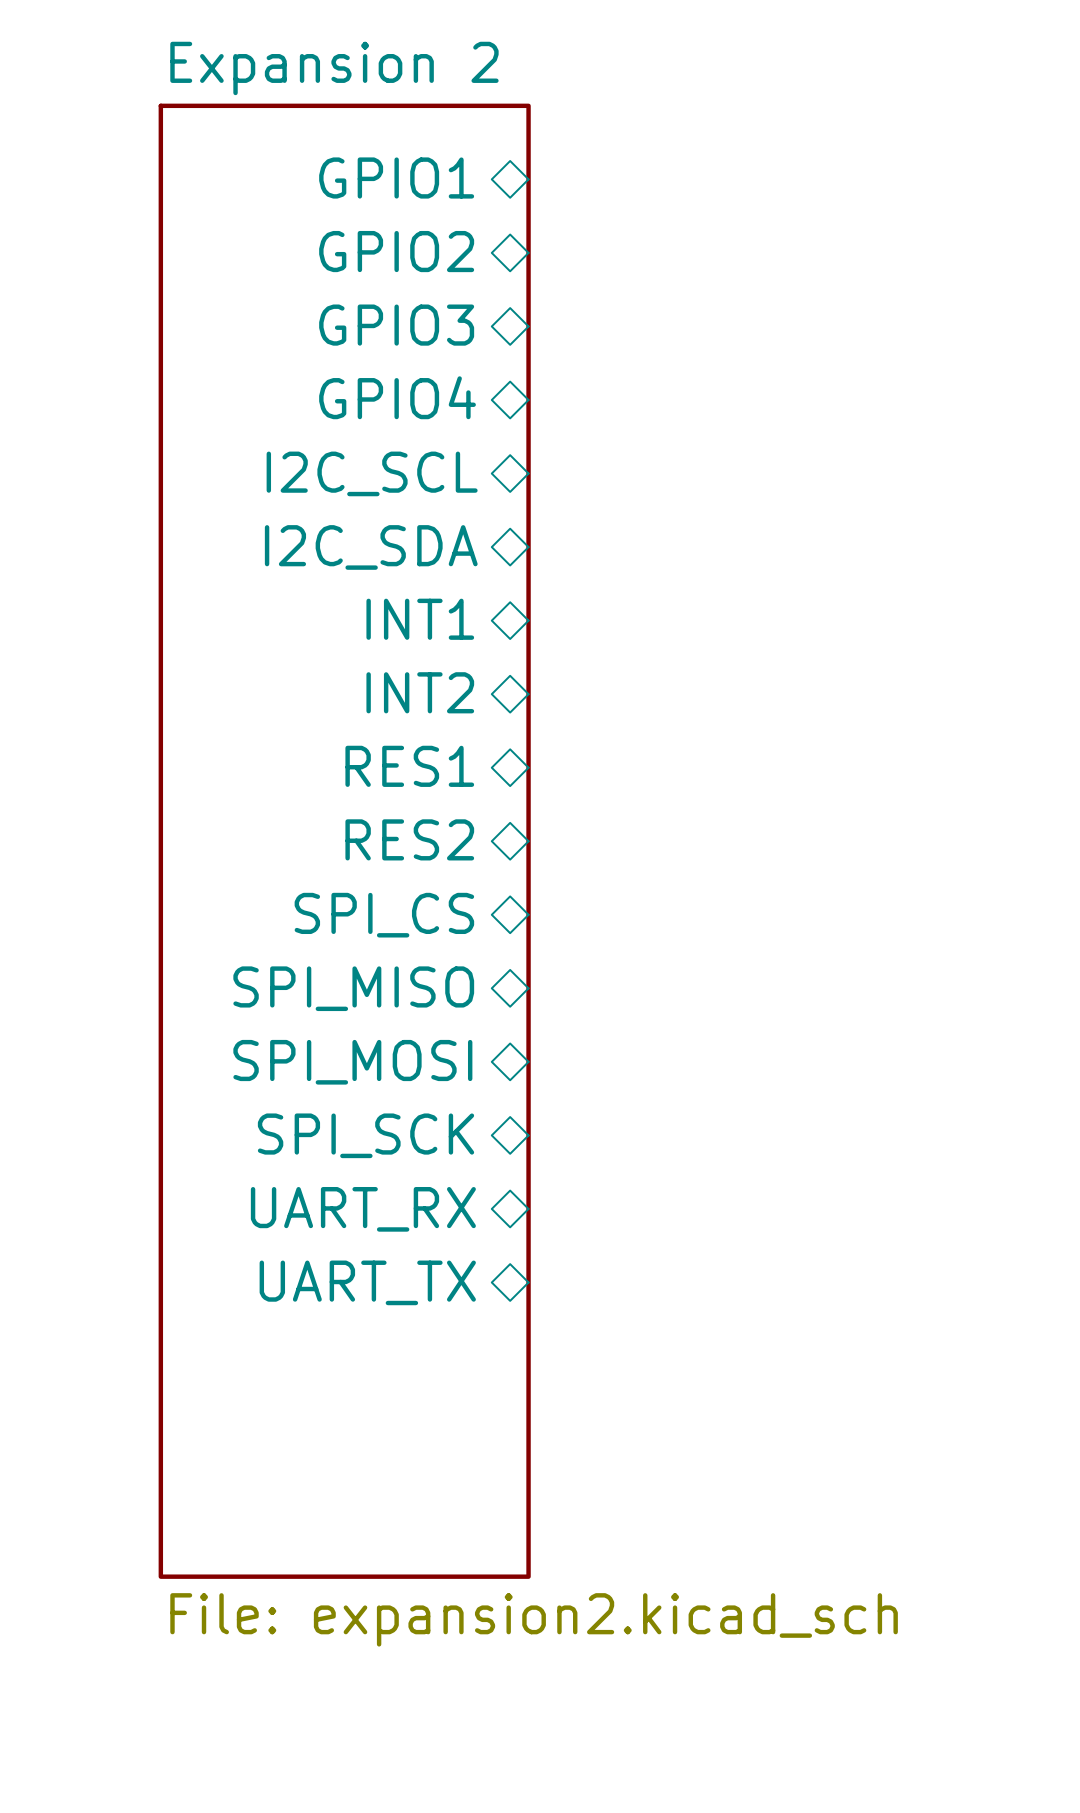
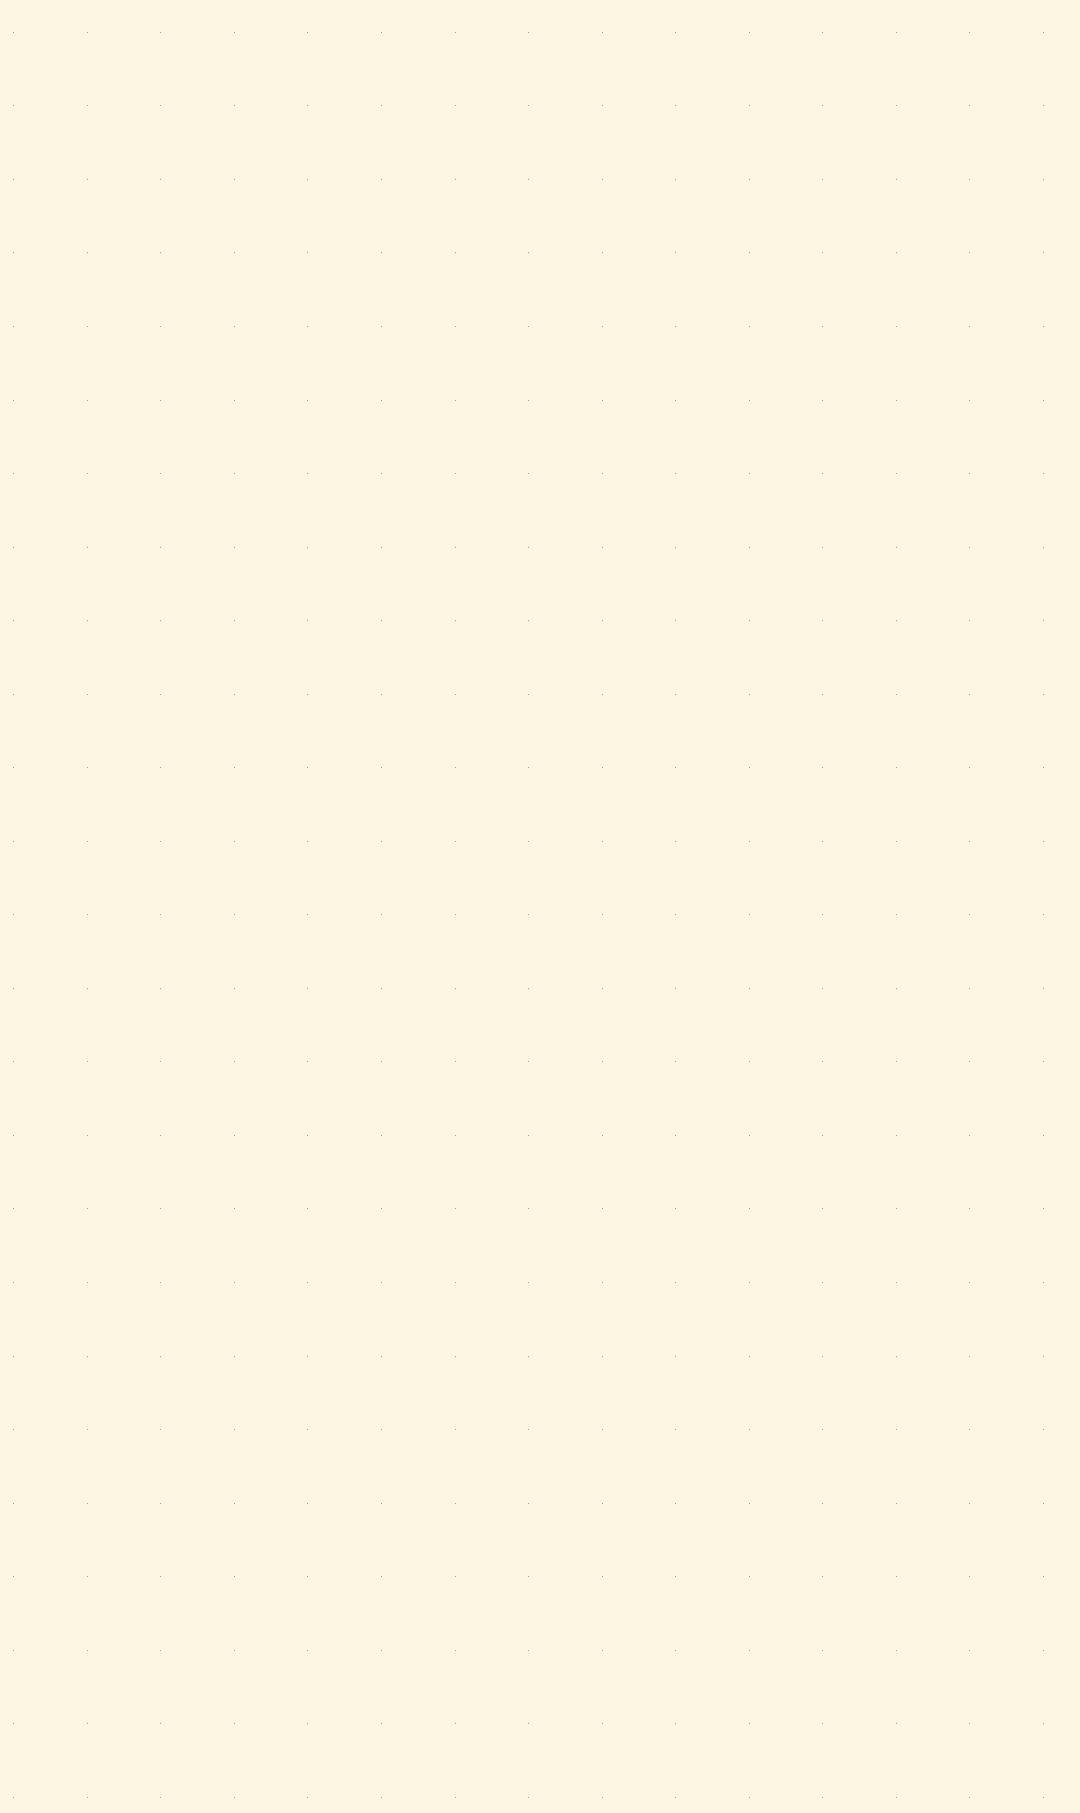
sheet pin: GPIO1 (396, 178) -> none
sheet pin: GPIO2 (396, 251) -> none
sheet pin: GPIO3 (396, 325) -> none
sheet pin: GPIO4 (397, 397) -> none
sheet pin: I2C_SCL (372, 473) -> none
sheet pin: I2C_SDA (371, 547) -> none
sheet pin: INT1 (420, 619) -> none
sheet pin: INT2 (420, 692) -> none
sheet pin: RES1 (409, 766) -> none
sheet pin: RES2 (409, 839) -> none
sheet Expansion 2: File: expansion2.kicad_sch (344, 841) -> none
sheet pin: SPI_CS (384, 915) -> none
sheet pin: SPI_MISO (353, 988) -> none
sheet pin: SPI_MOSI (352, 1062) -> none
sheet pin: SPI_SCK (366, 1135) -> none
sheet pin: UART_RX (363, 1209) -> none
sheet pin: UART_TX (367, 1282) -> none

